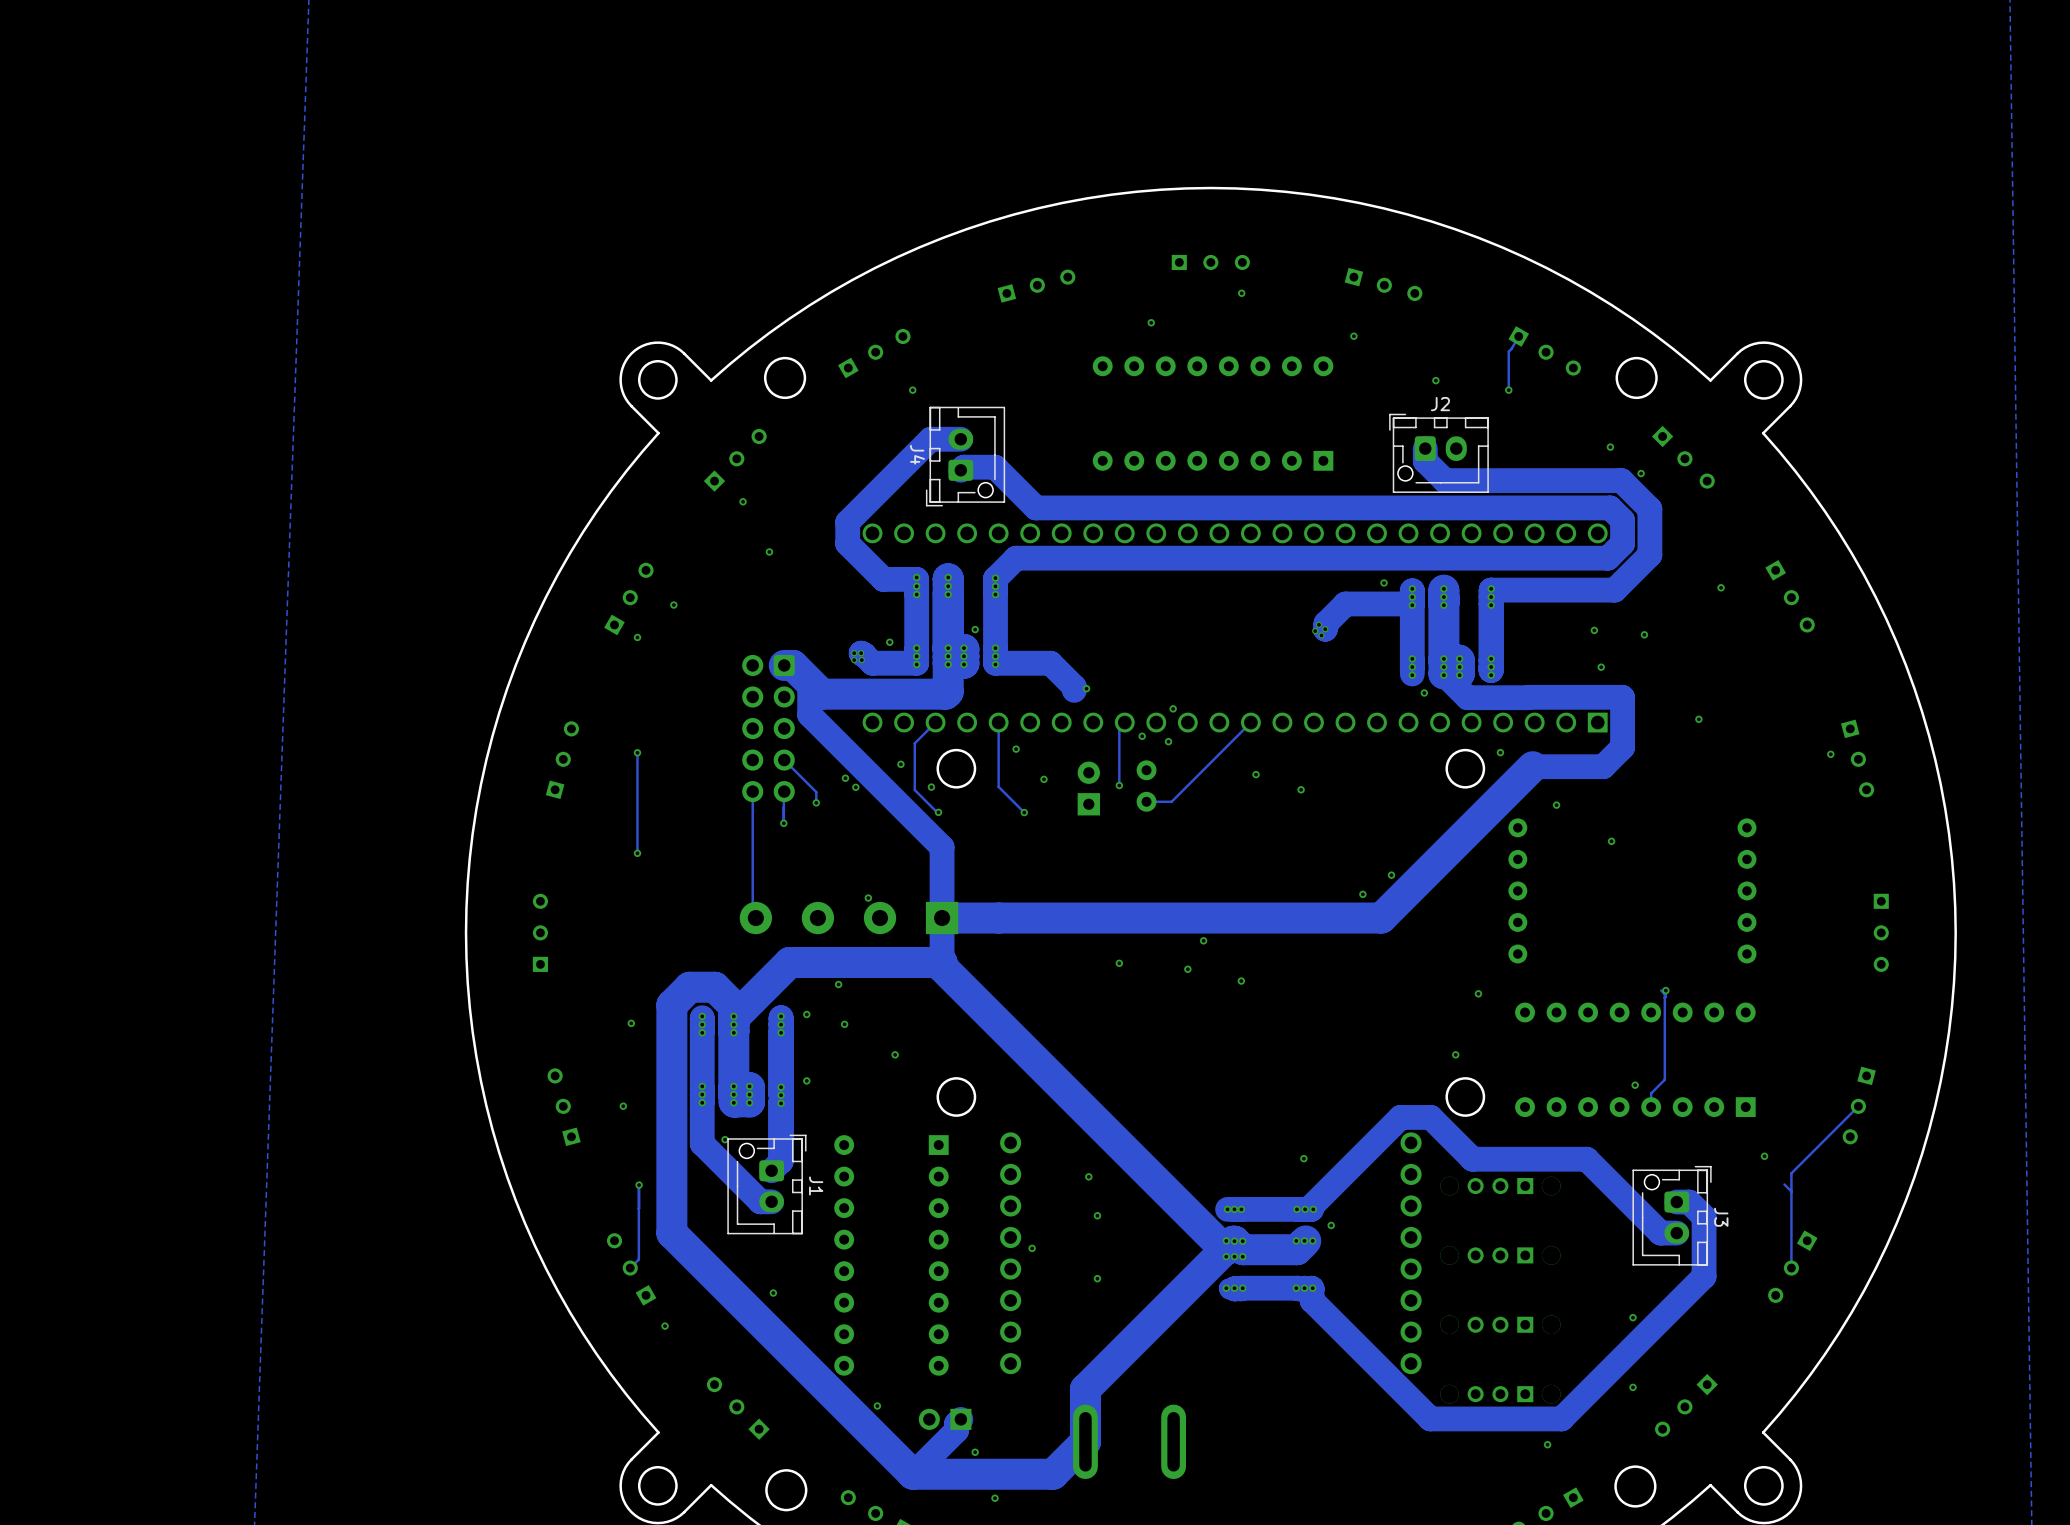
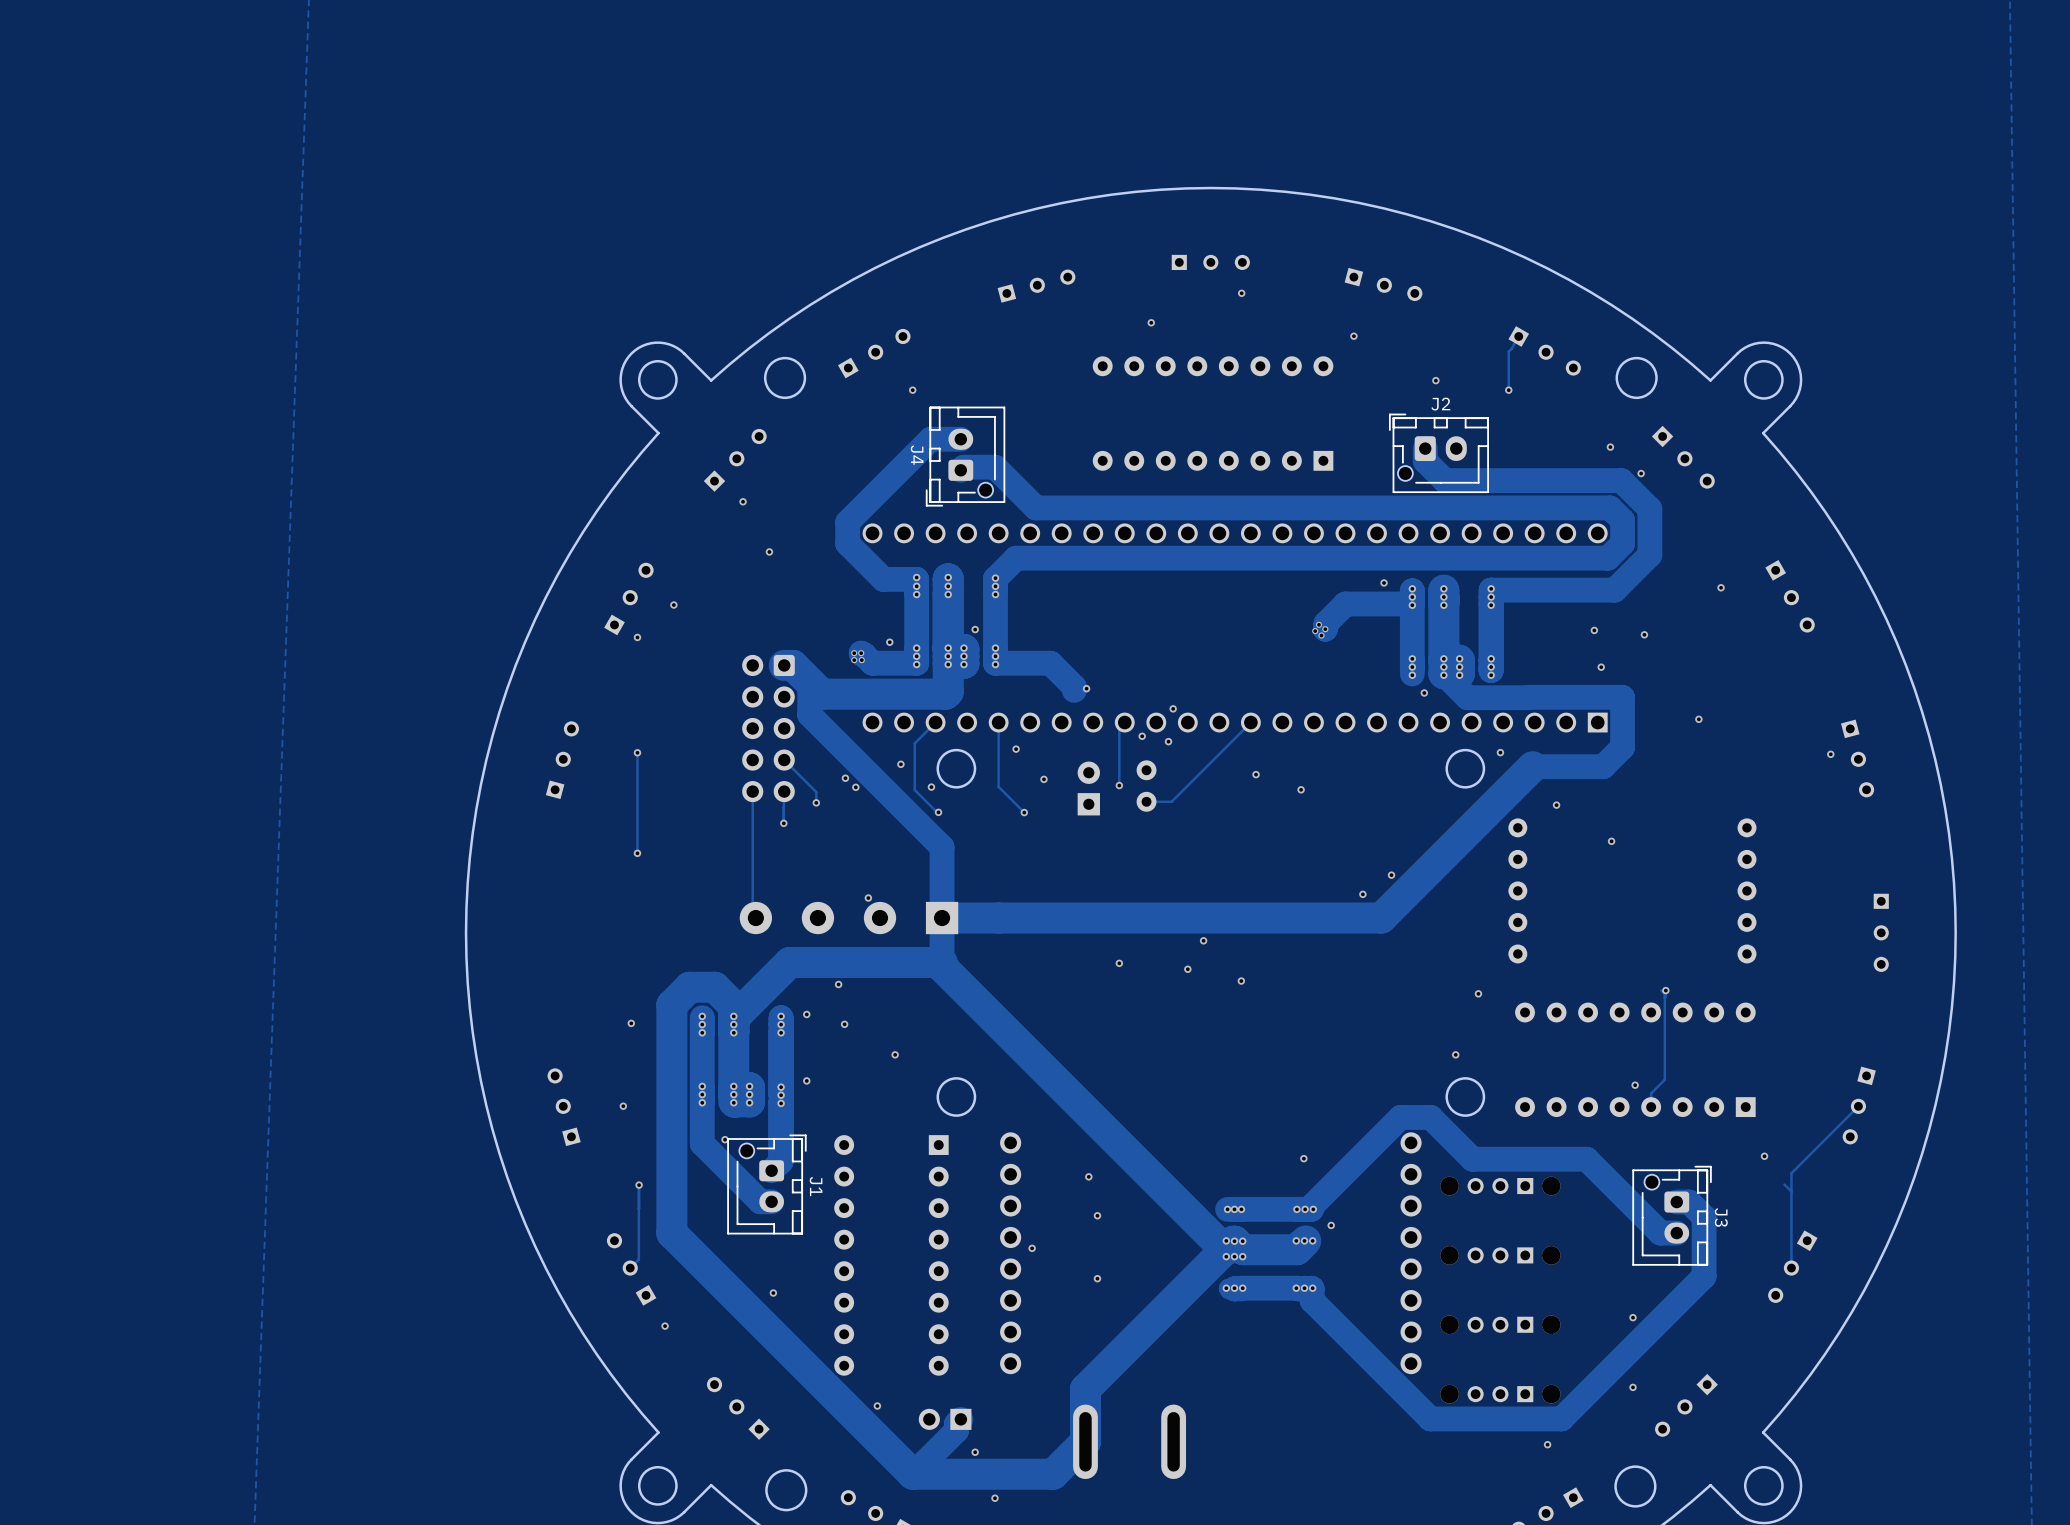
part: (540, 932) -> none

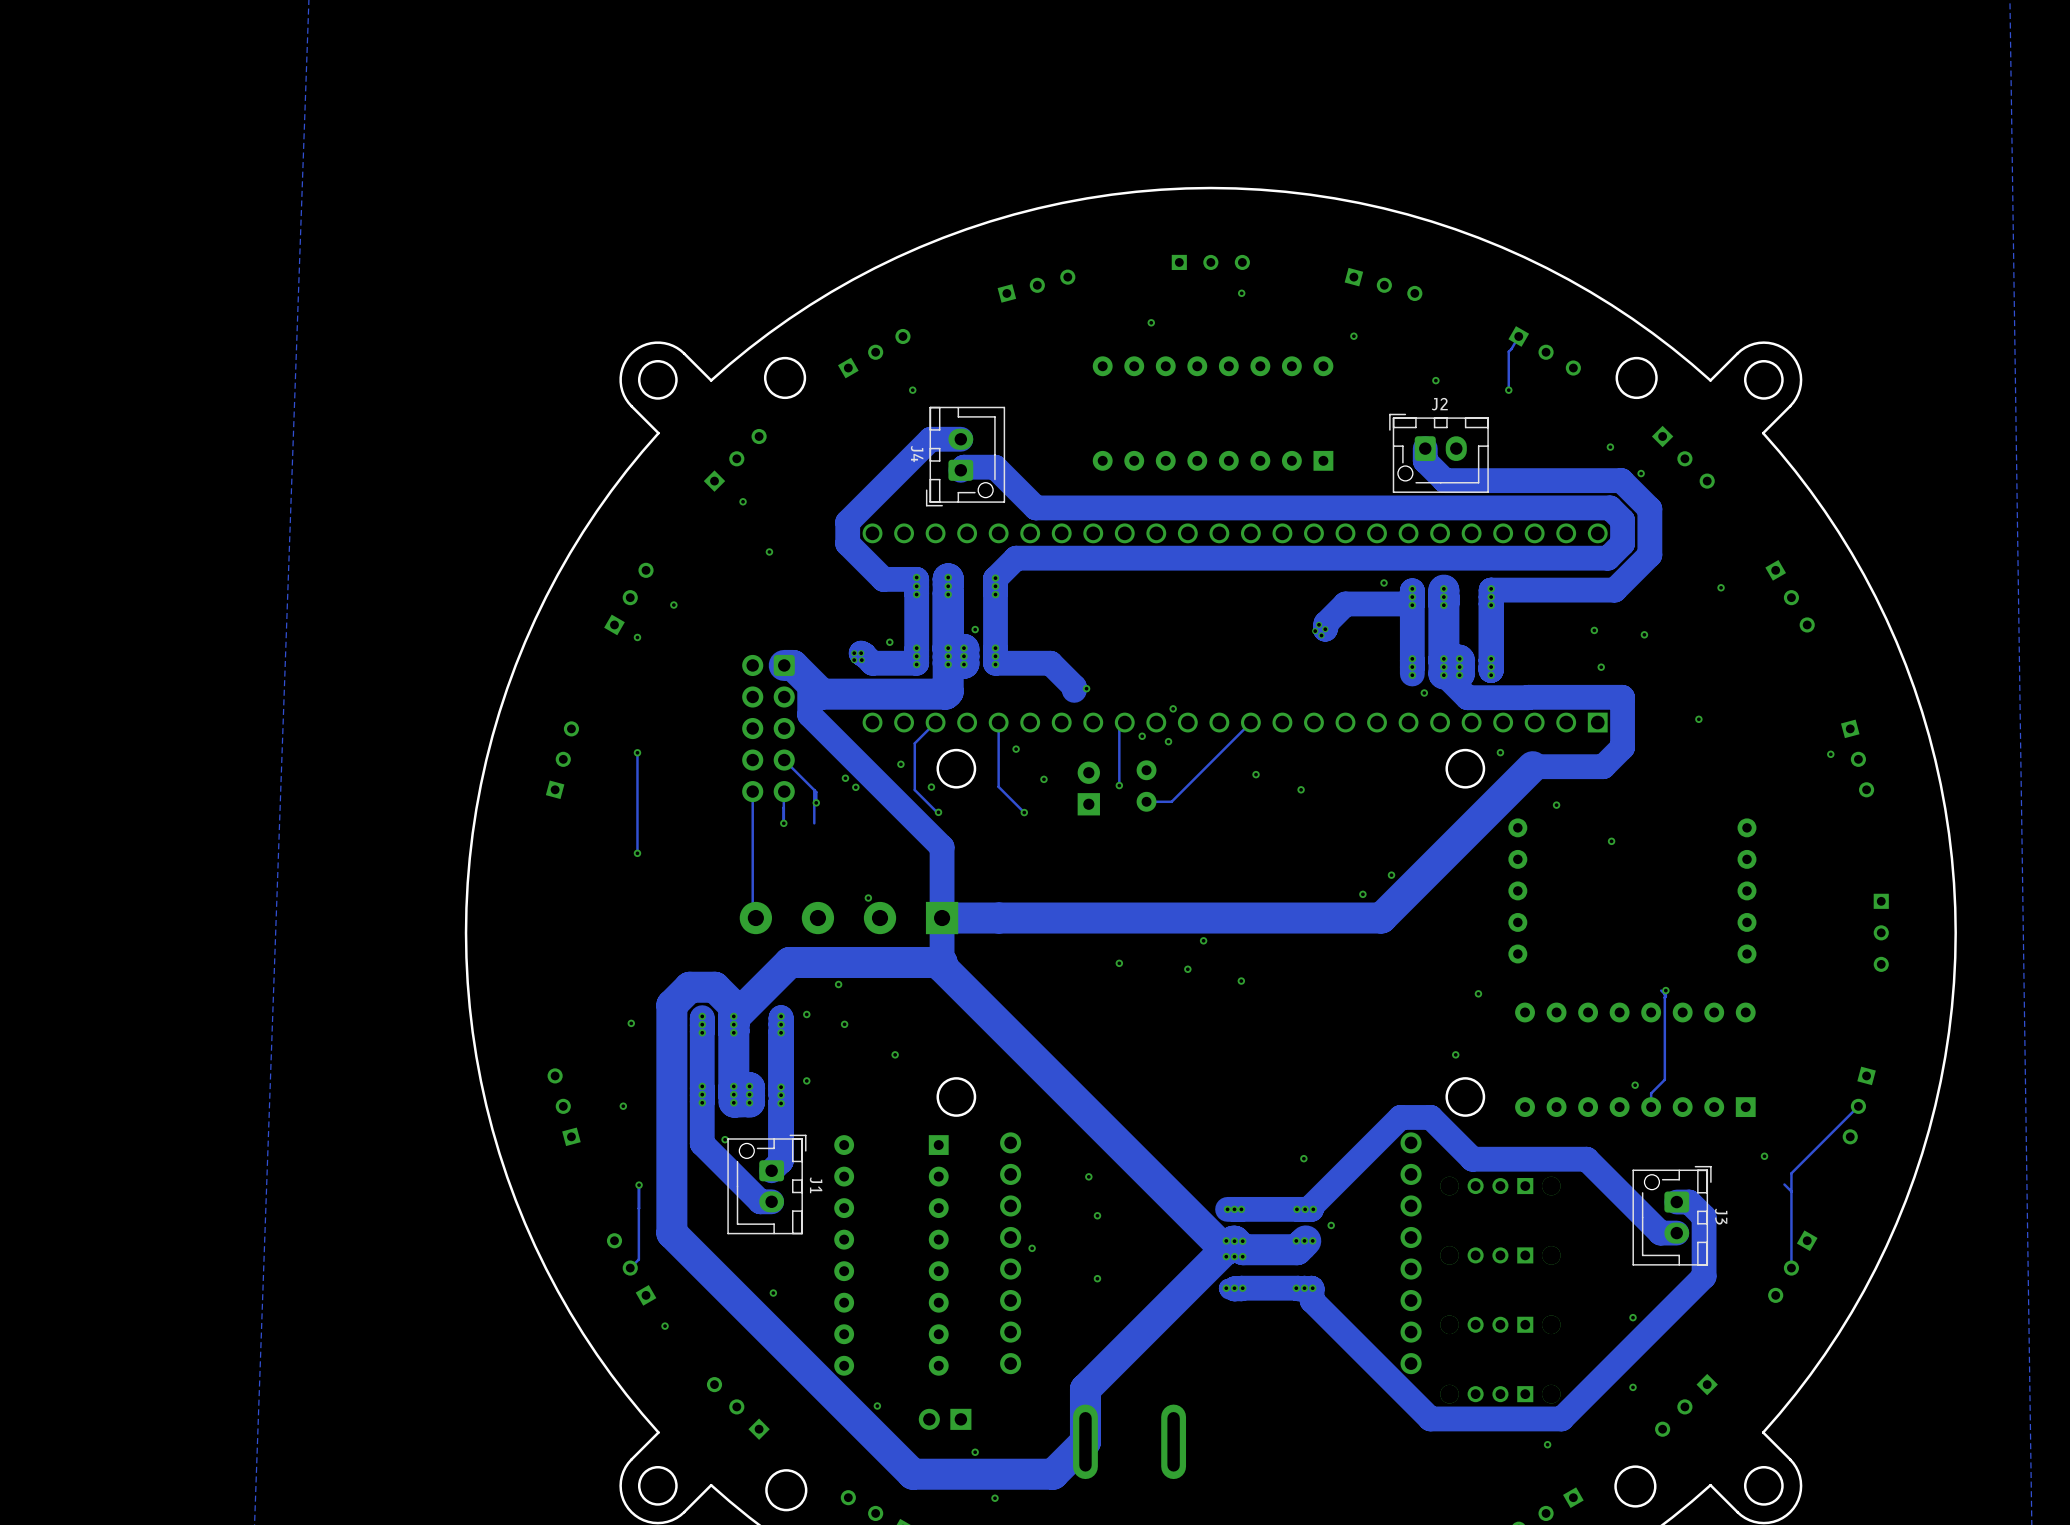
track: none -> (814, 790) (814, 823)
track: (960, 1419) (956, 1423) (956, 1430) (912, 1474) -> none

